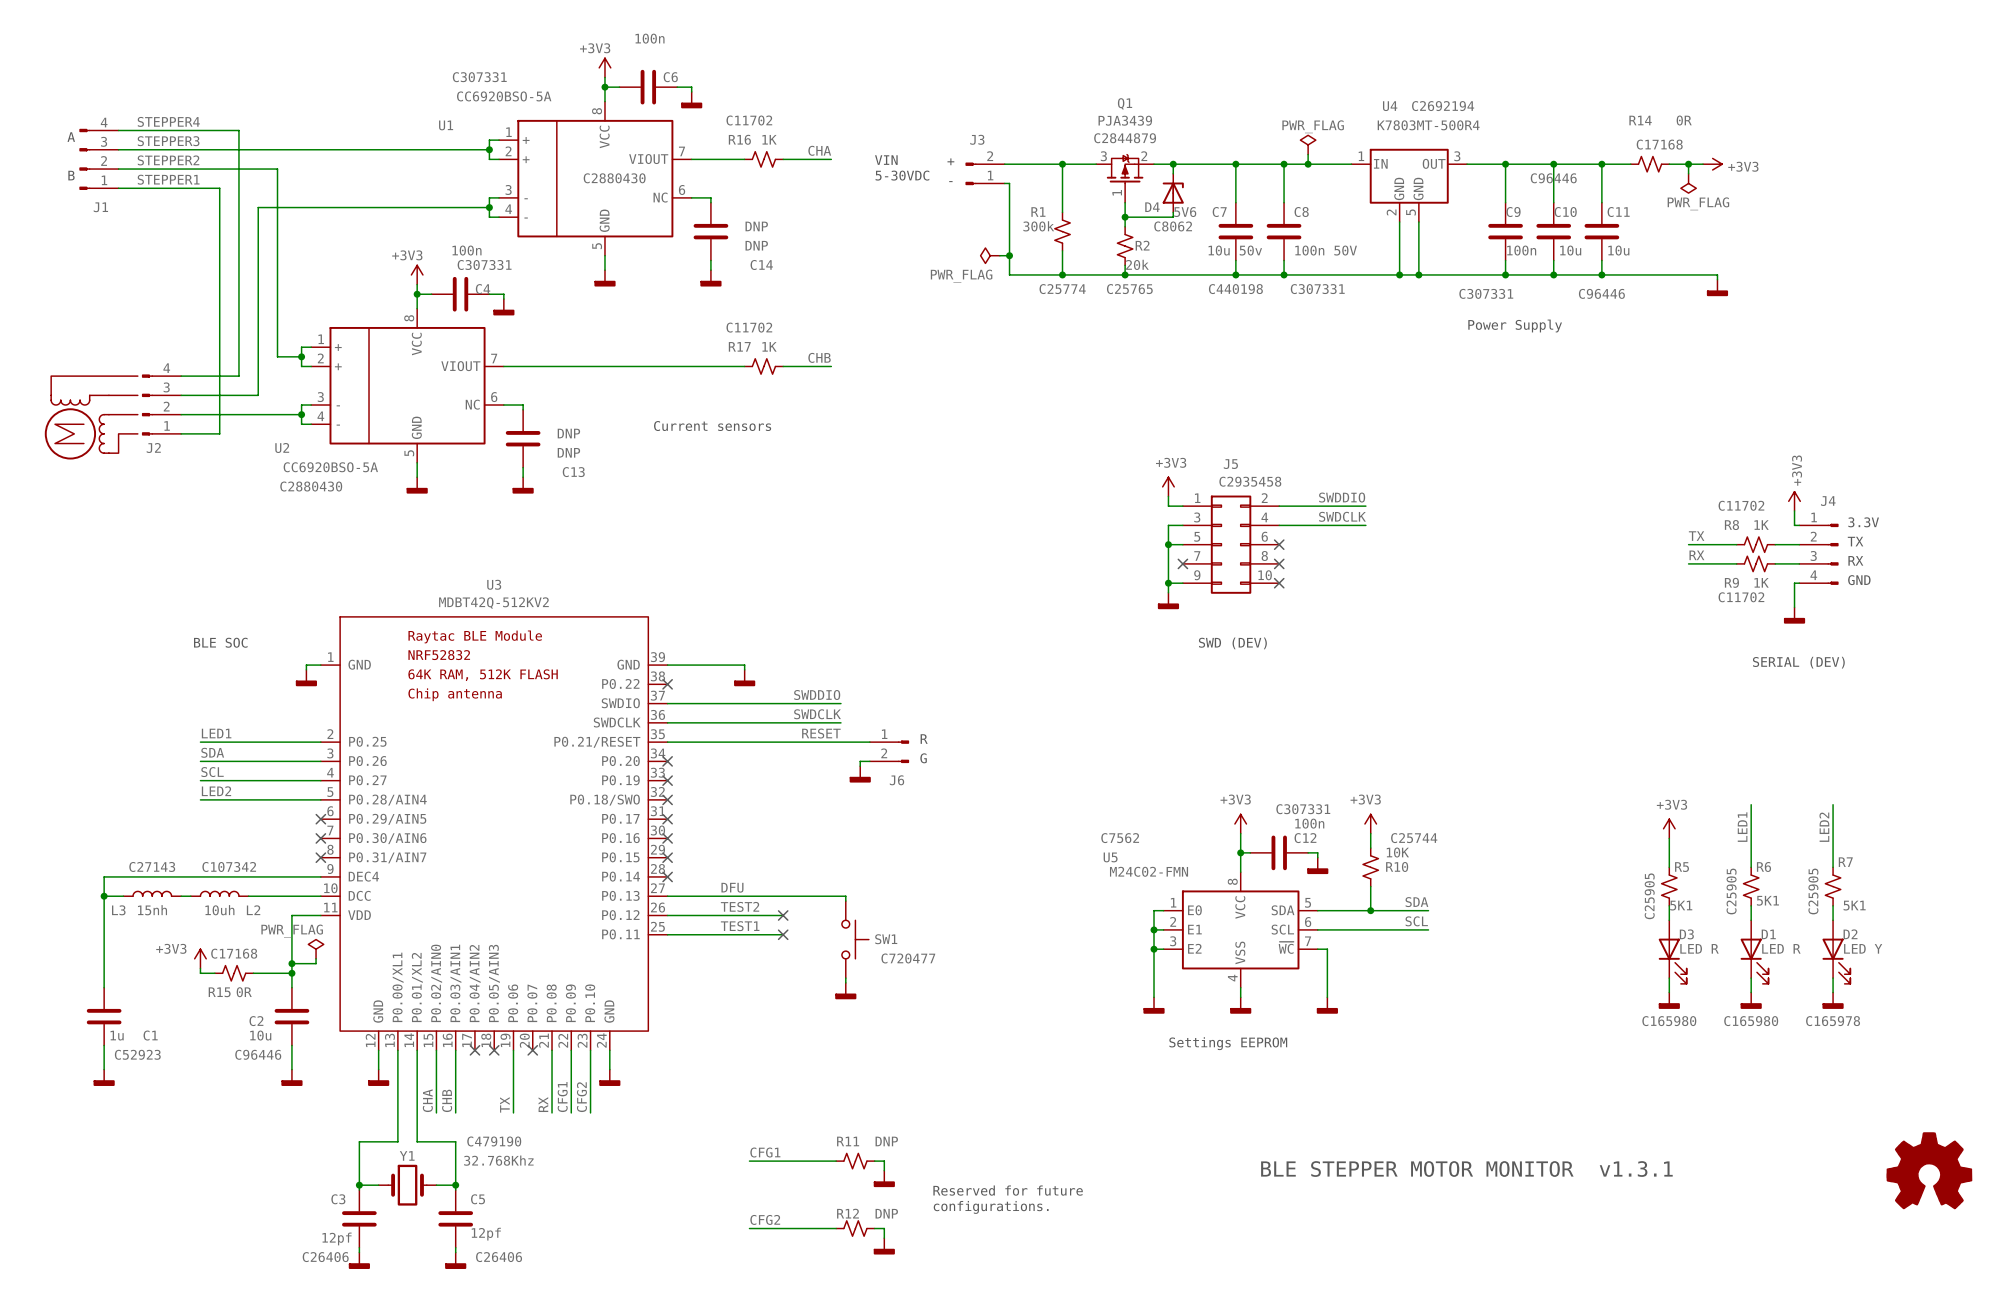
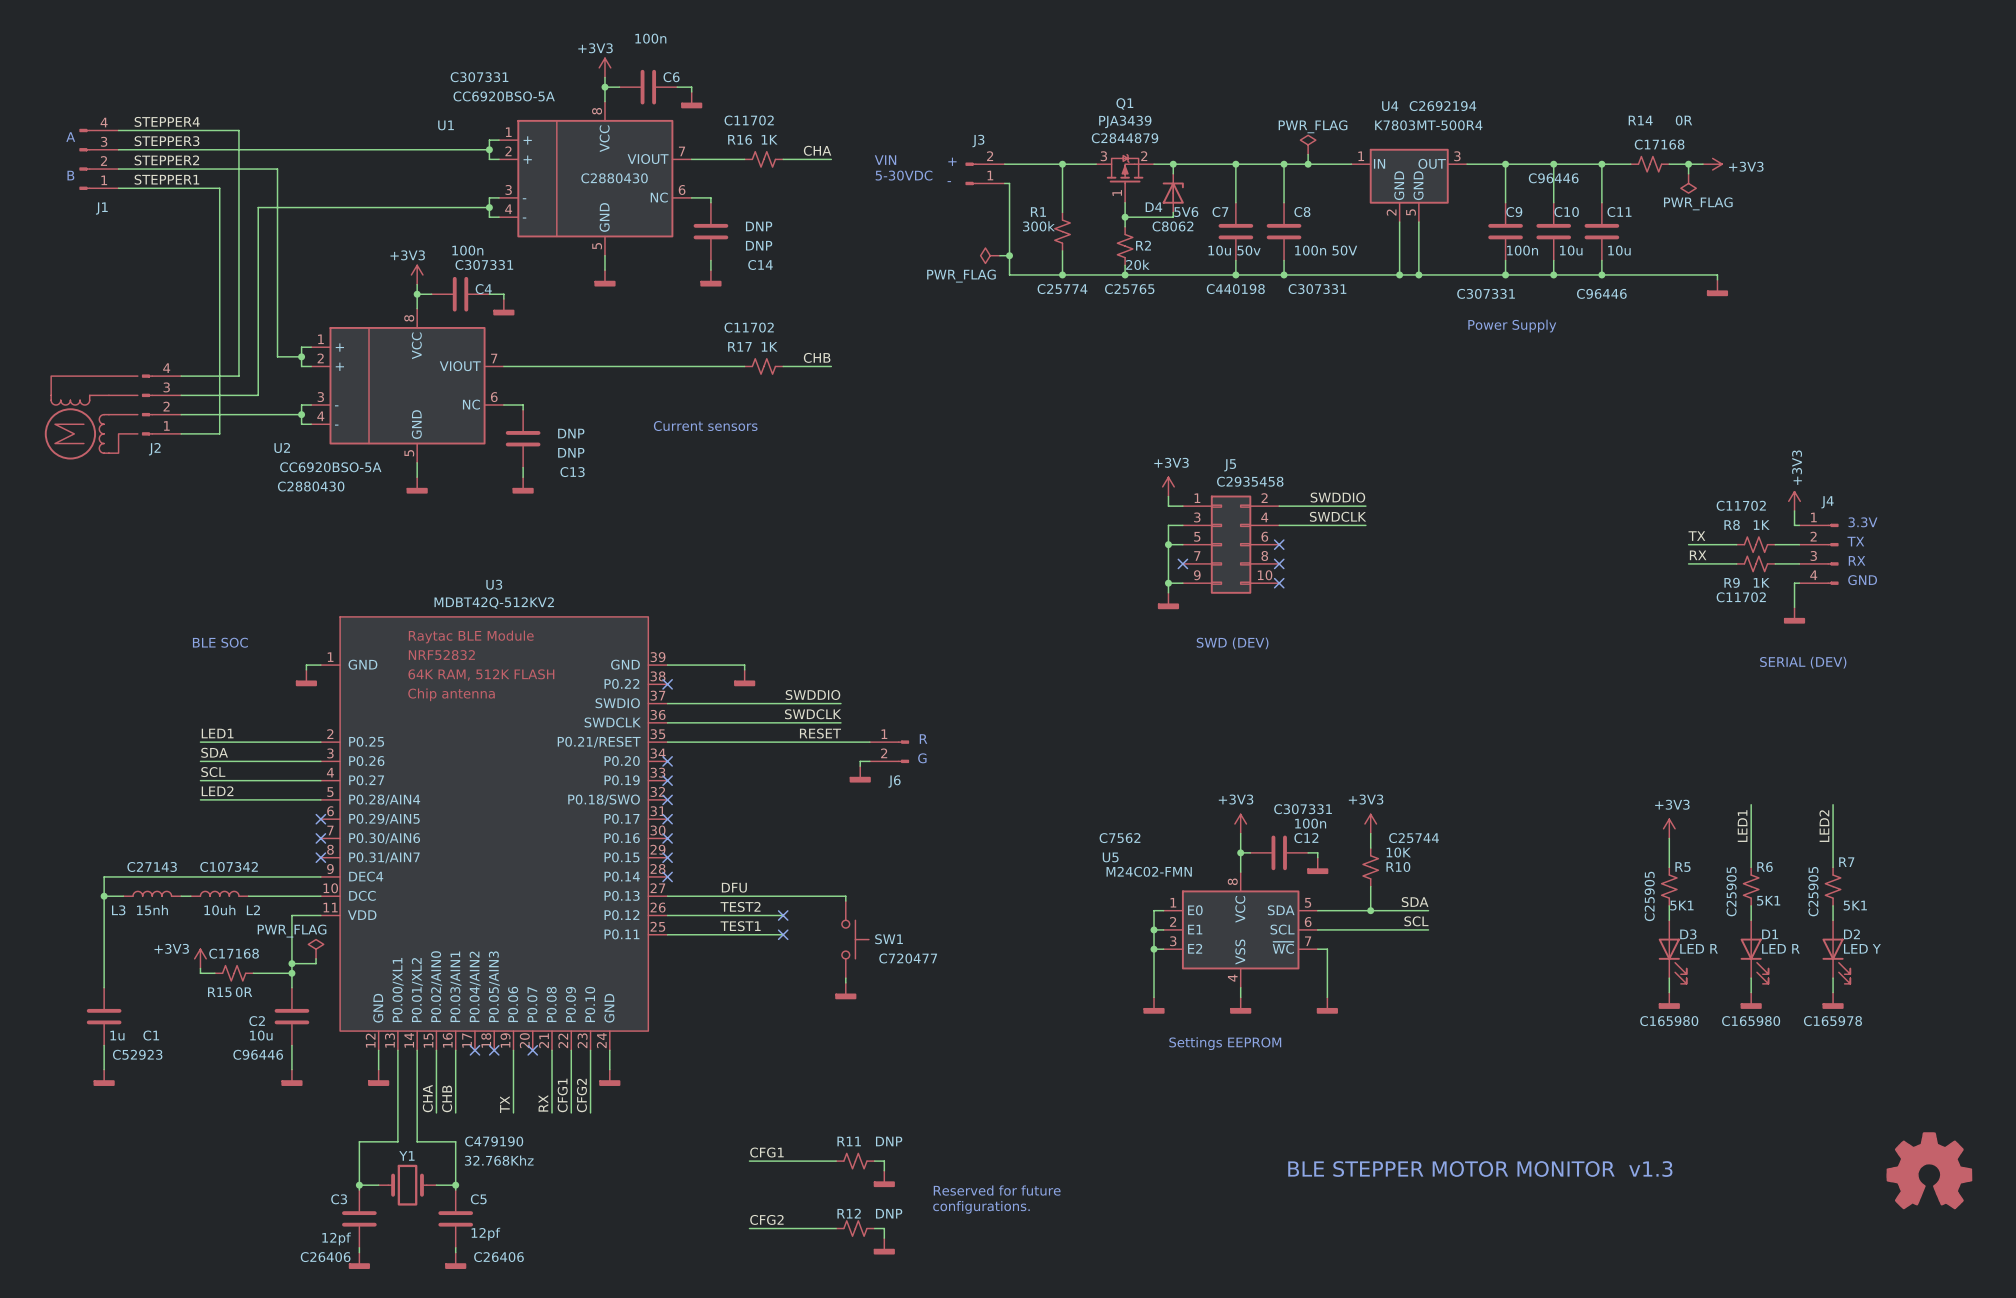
text: BLE STEPPER MOTOR MONITOR v1.3.1 (1466, 1169) -> BLE STEPPER MOTOR MONITOR v1.3 (1480, 1169)

